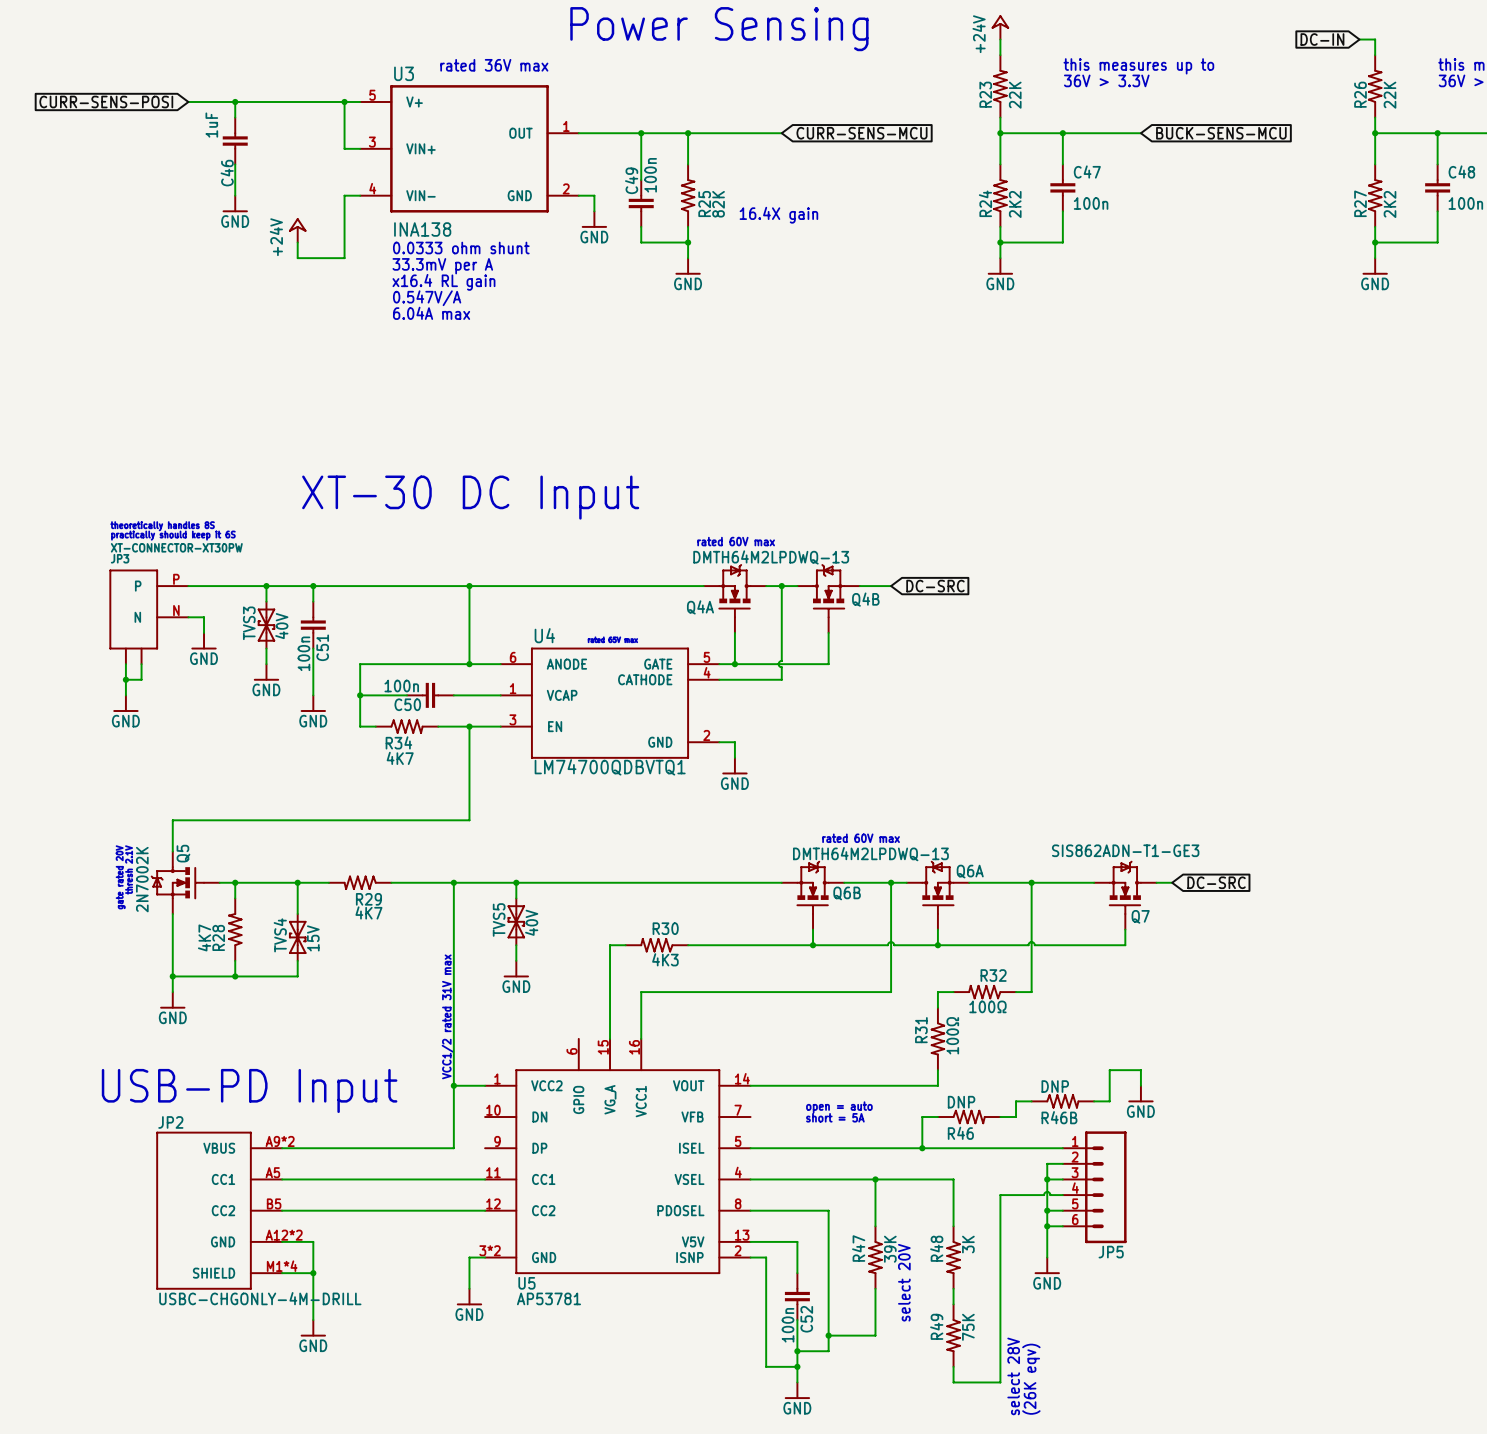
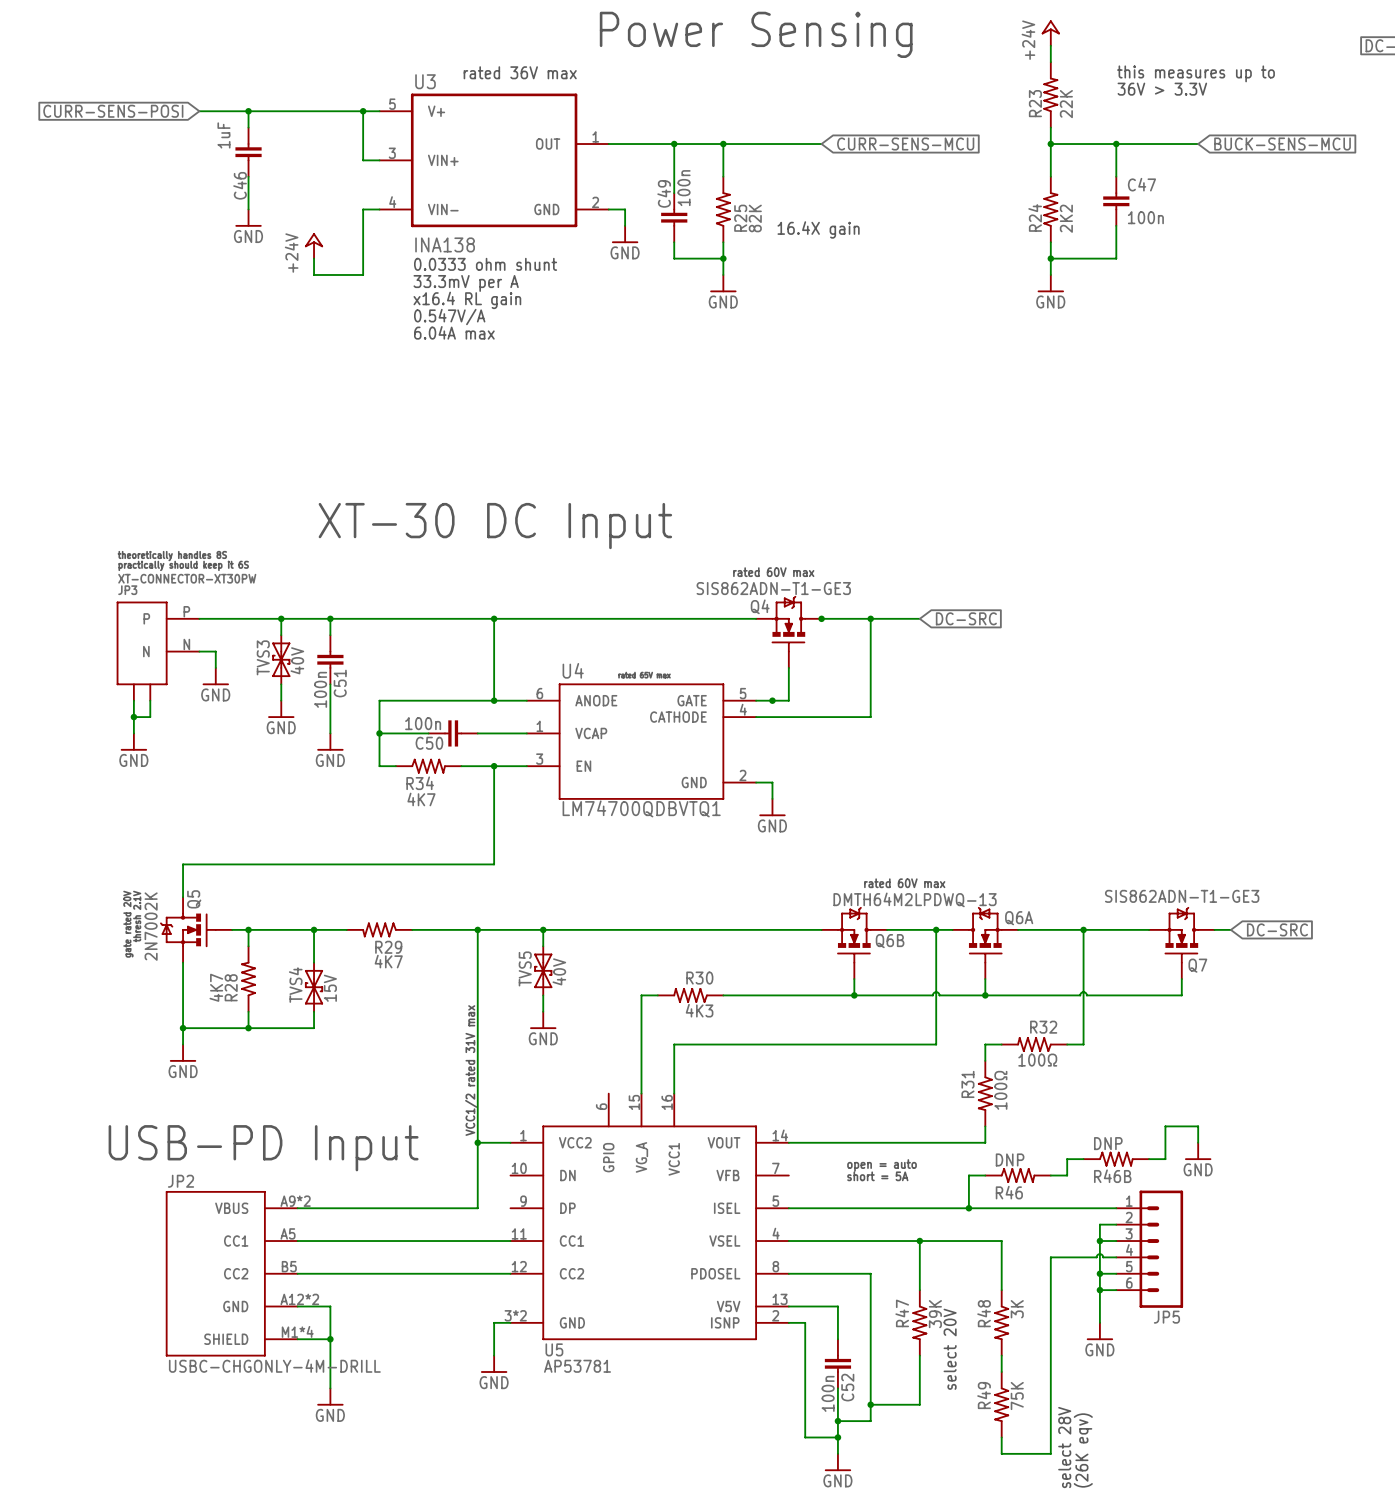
wire: (766, 586) (781, 586) (781, 661) (778, 664) (781, 667) (781, 679) -> none
junction: none -> (870, 618)
wire: (875, 586) (891, 586) -> none
global label position: DC-SRC (935, 586) -> DC-SRC (966, 618)
Q4A: (734, 598) -> none
Q4: none -> SIS862ADN-T1-GE3 (788, 632)
Q4B: DMTH64M2LPDWQ-13 (828, 598) -> none
wire: (734, 632) (734, 664) -> (788, 667) (788, 700)
wire: (750, 664) (828, 664) -> (821, 717) (870, 717) (870, 700)

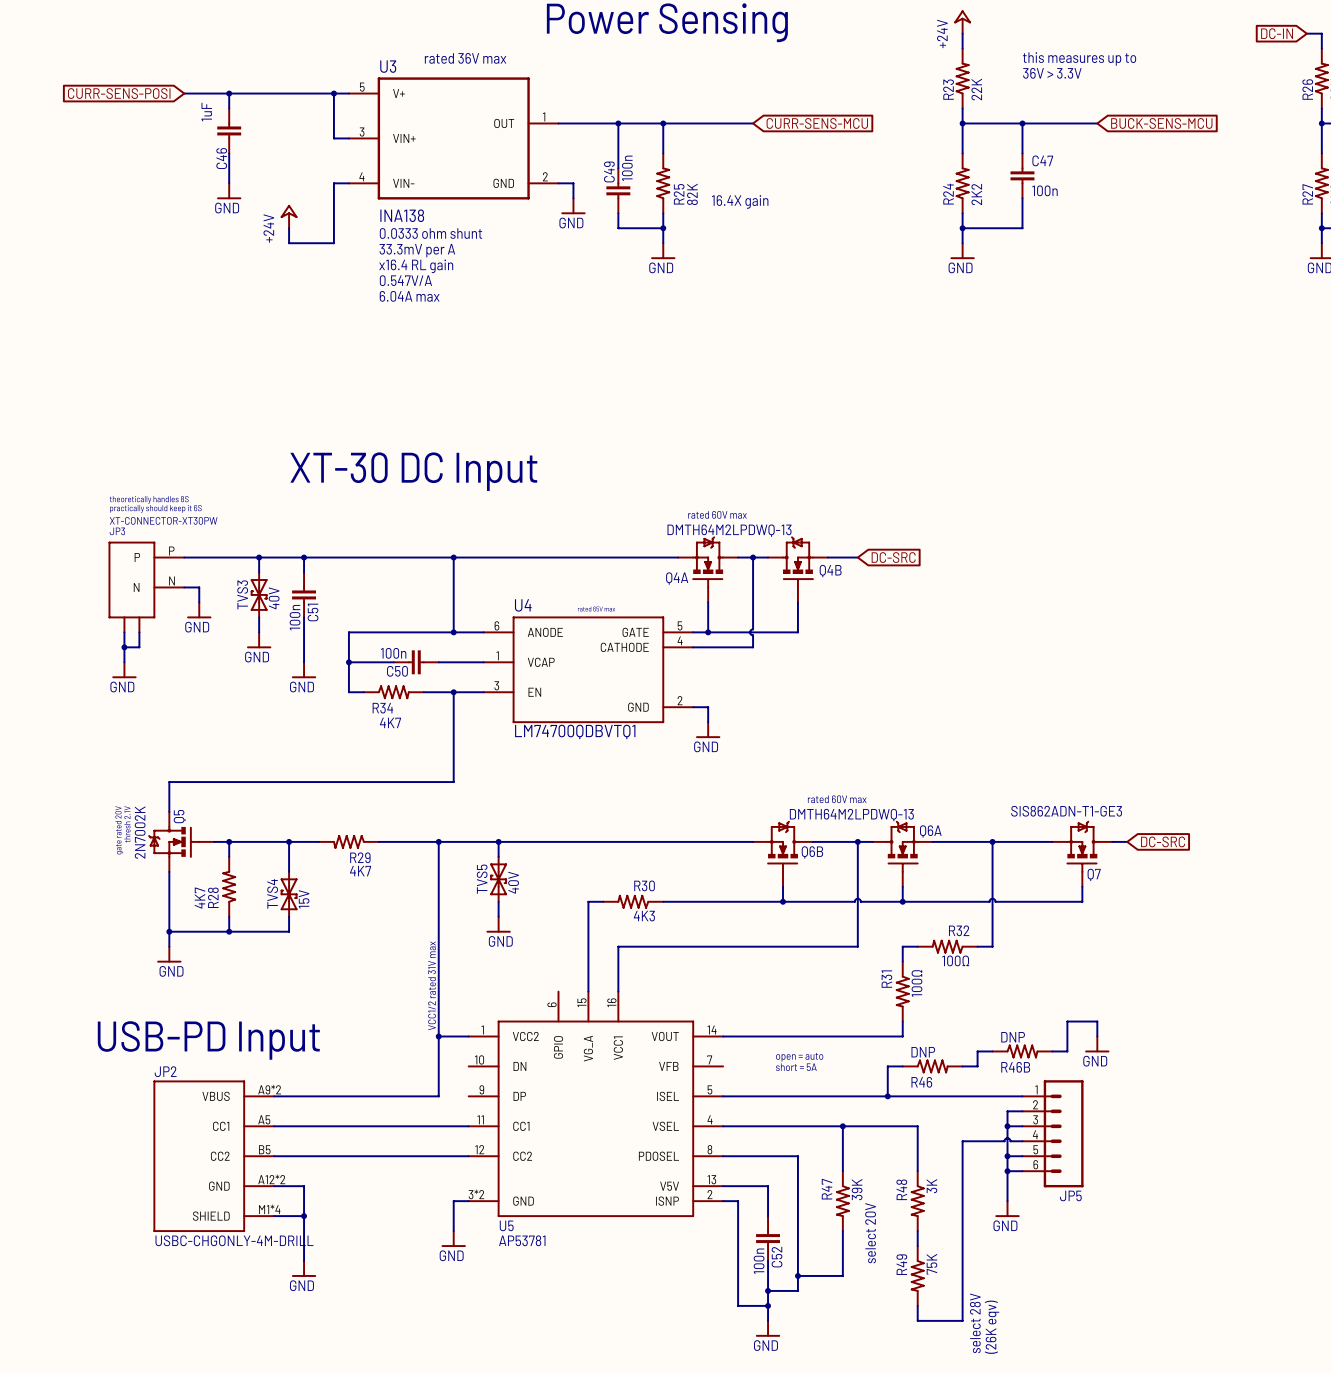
wire: none -> (738, 557) (753, 557) (753, 629) (750, 632) (753, 635) (753, 647)
junction: (870, 618) -> none
wire: none -> (842, 557) (857, 557)
global label position: DC-SRC (966, 618) -> DC-SRC (893, 557)
Q4A: none -> (708, 569)
Q4: SIS862ADN-T1-GE3 (788, 632) -> none
Q4B: none -> DMTH64M2LPDWQ-13 (797, 569)
wire: (788, 667) (788, 700) -> (708, 602) (708, 632)
wire: (870, 700) (870, 717) (821, 717) -> (797, 632) (723, 632)

